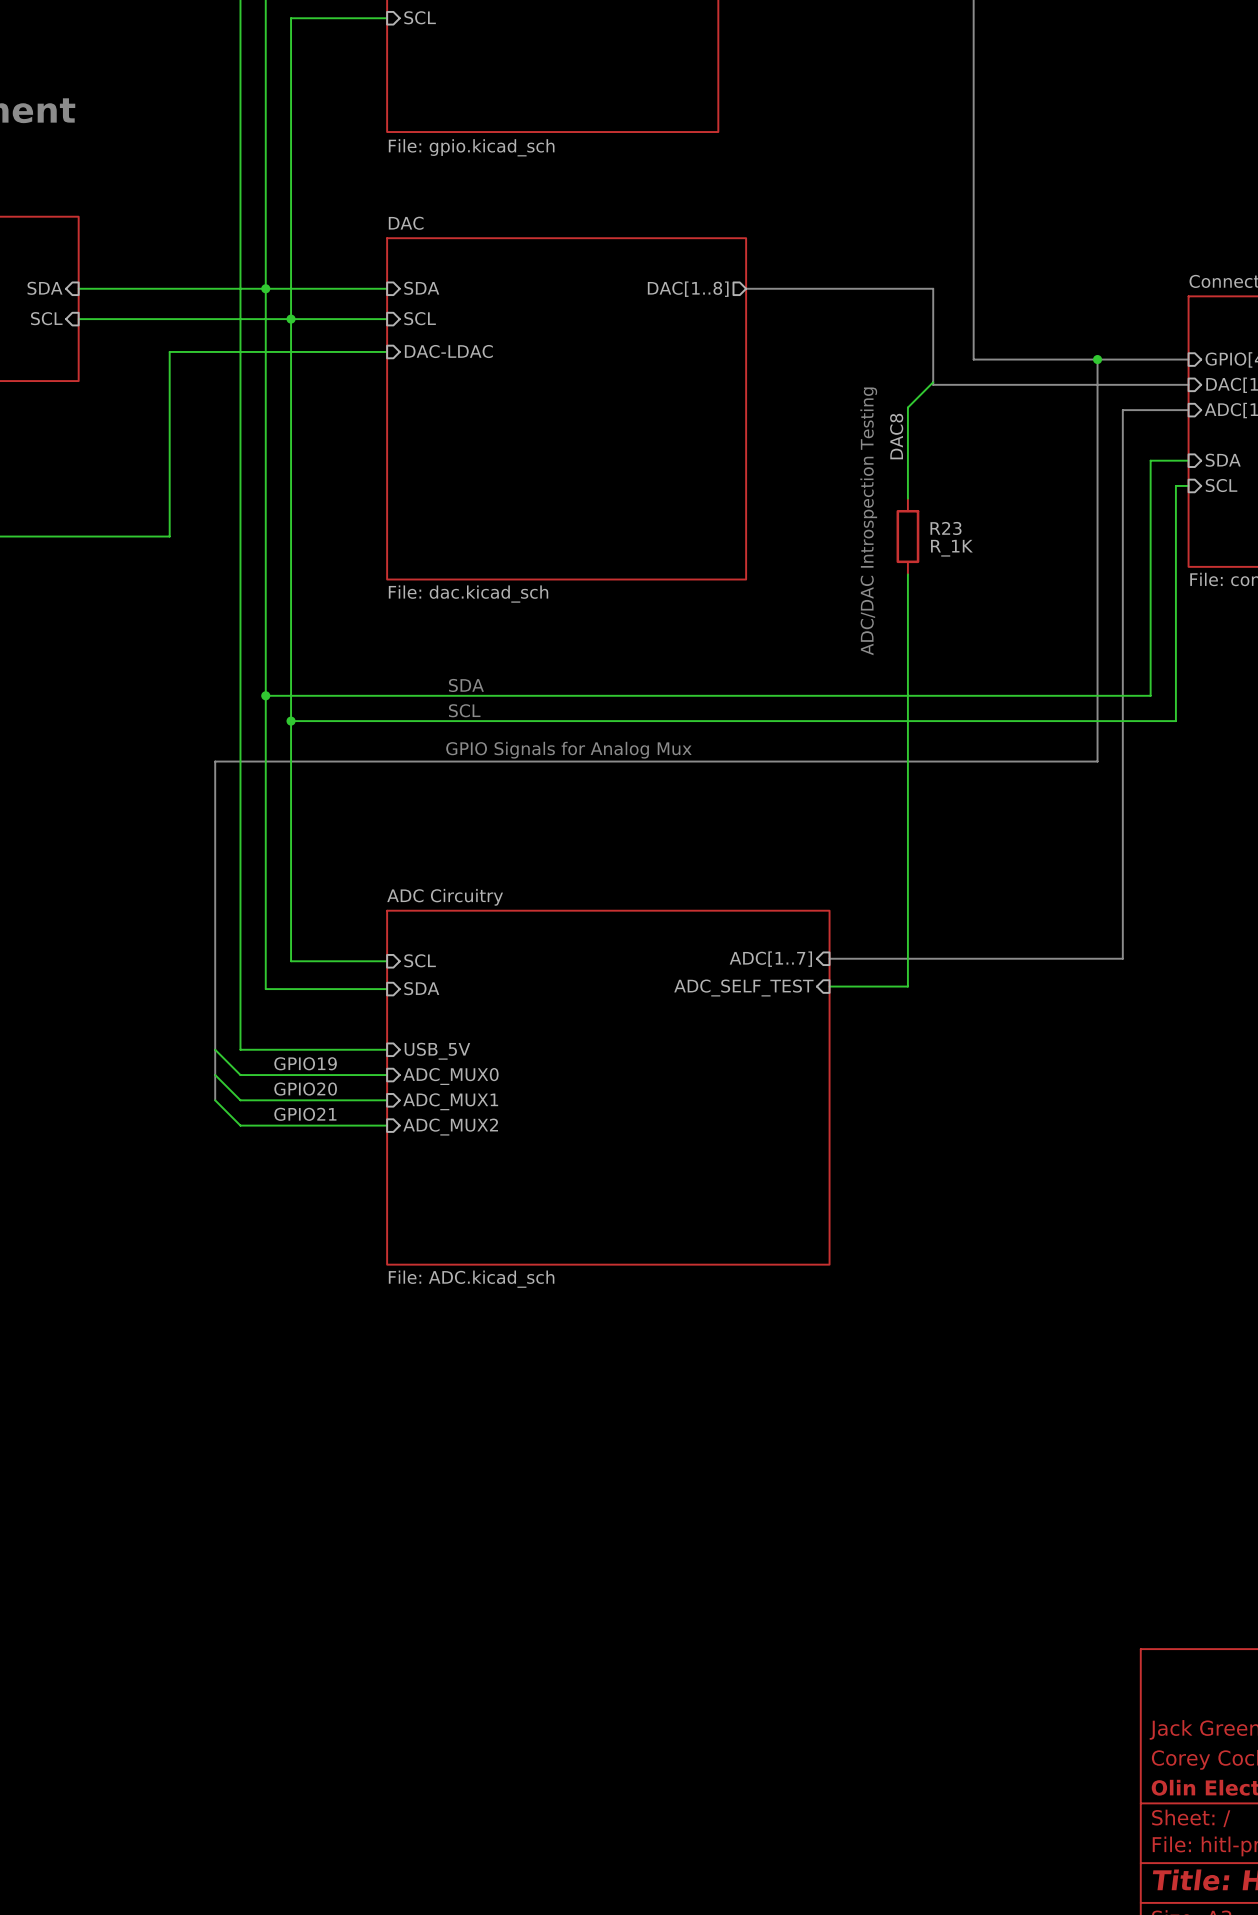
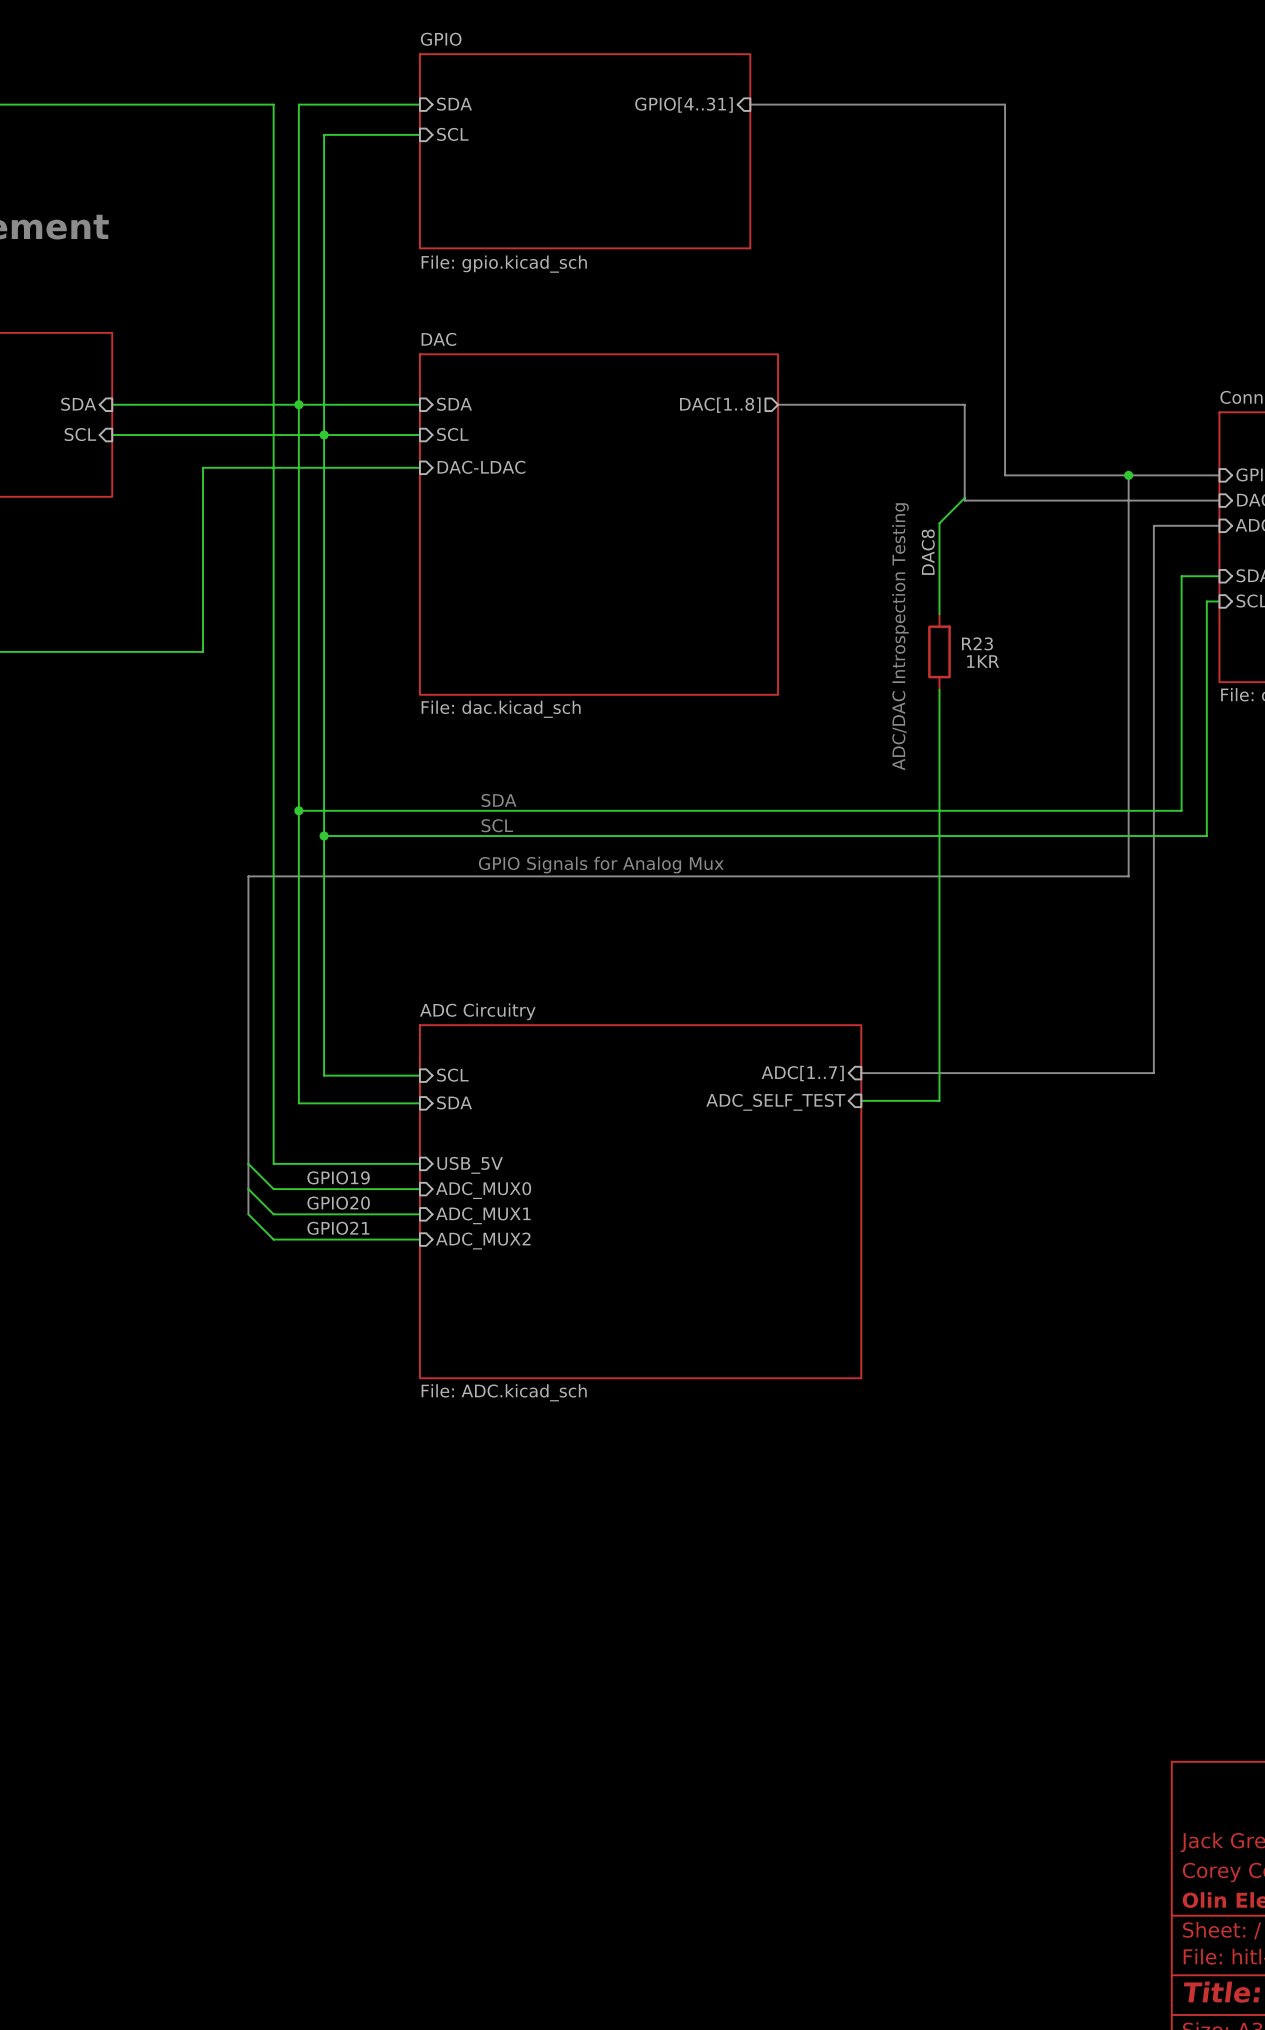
R23 value: R_1K (951, 548) -> 1KR (983, 661)

